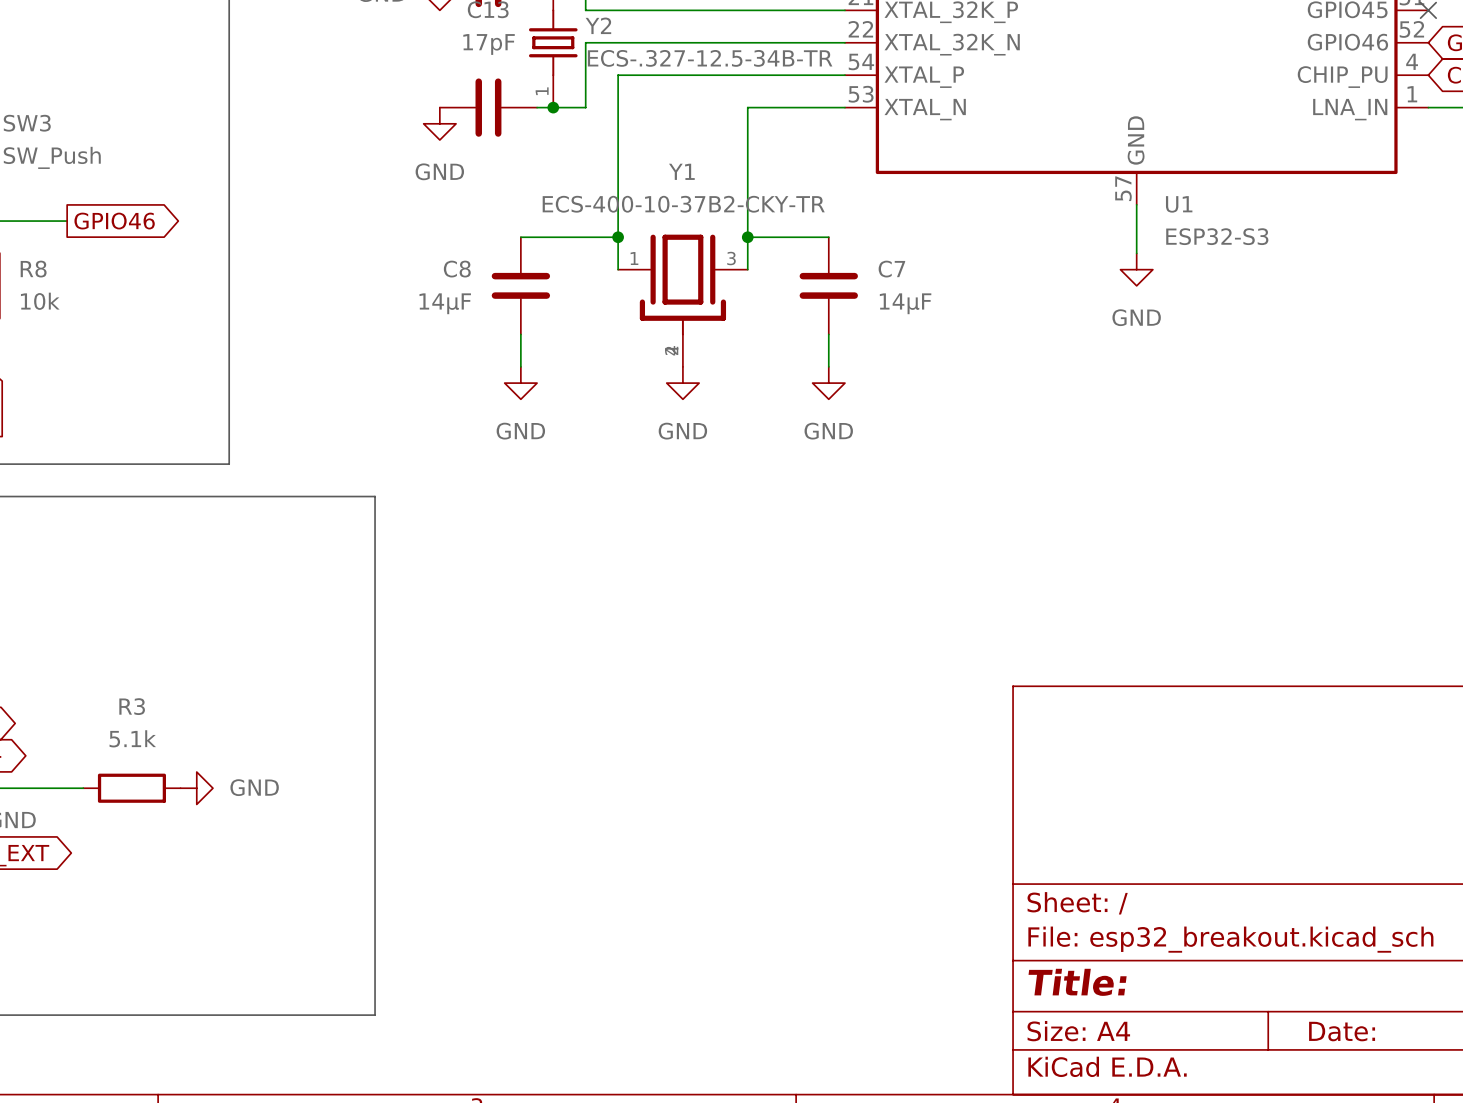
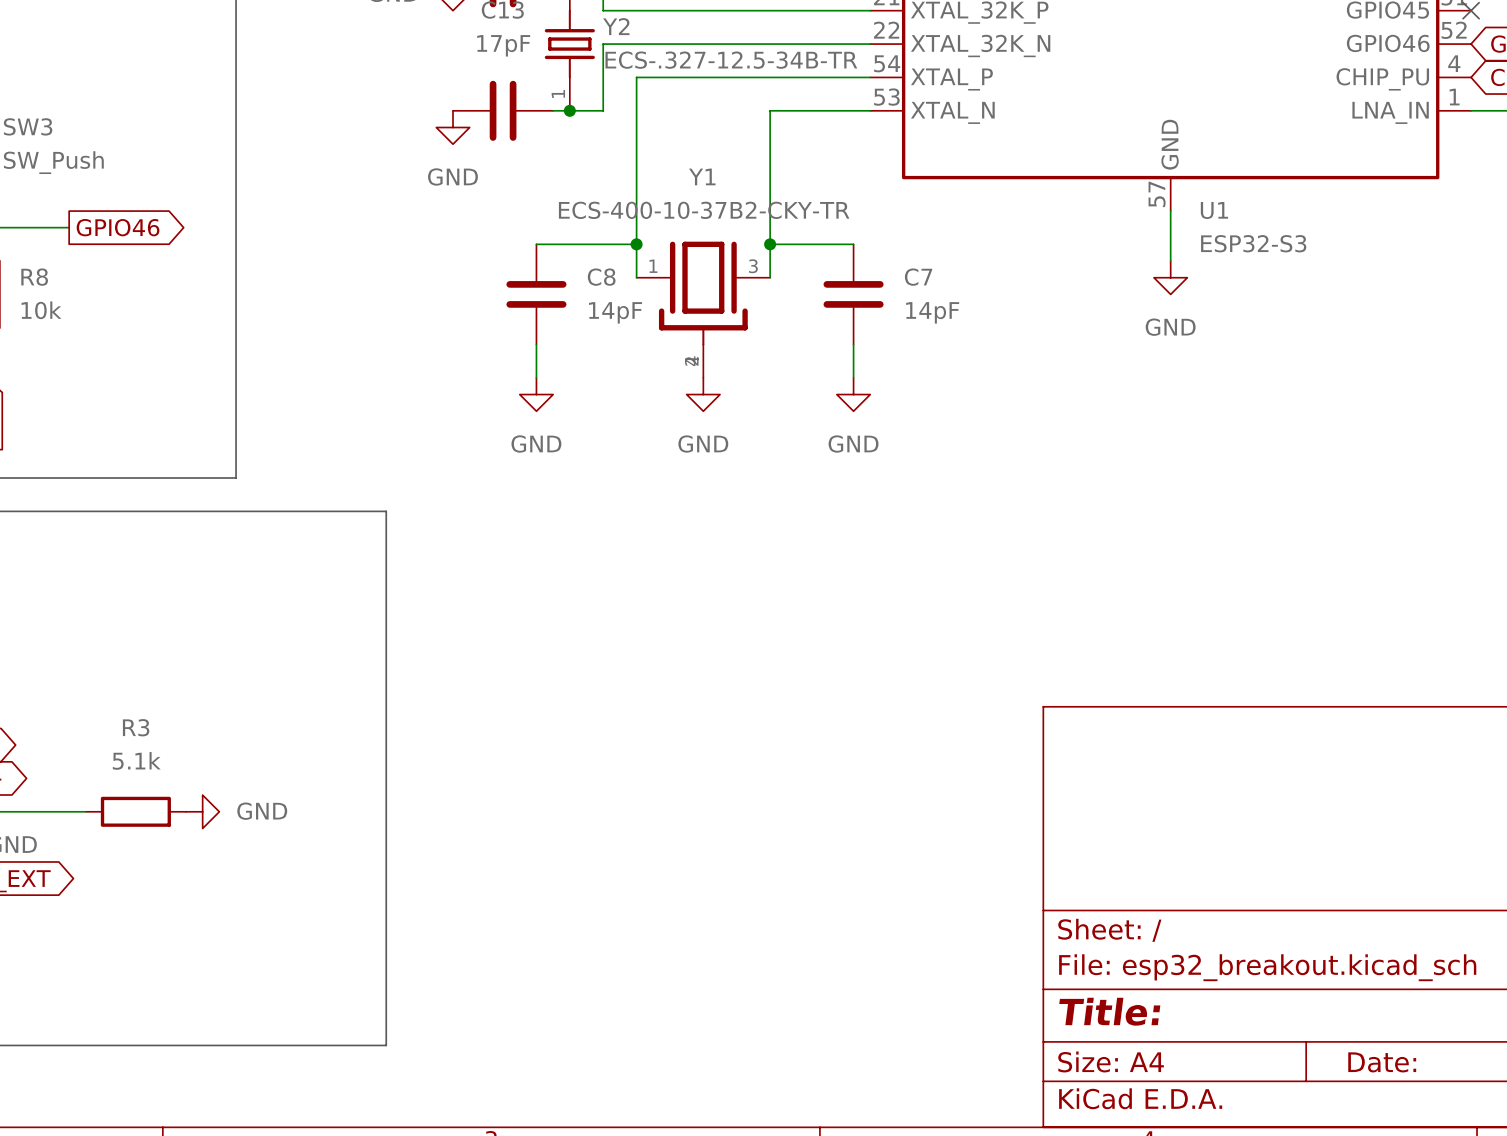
C8 name position: C8 (457, 269) -> C8 (601, 277)
C8 value: 14µF (445, 303) -> 14pF (615, 312)
C7 value: 14µF (905, 303) -> 14pF (932, 312)

